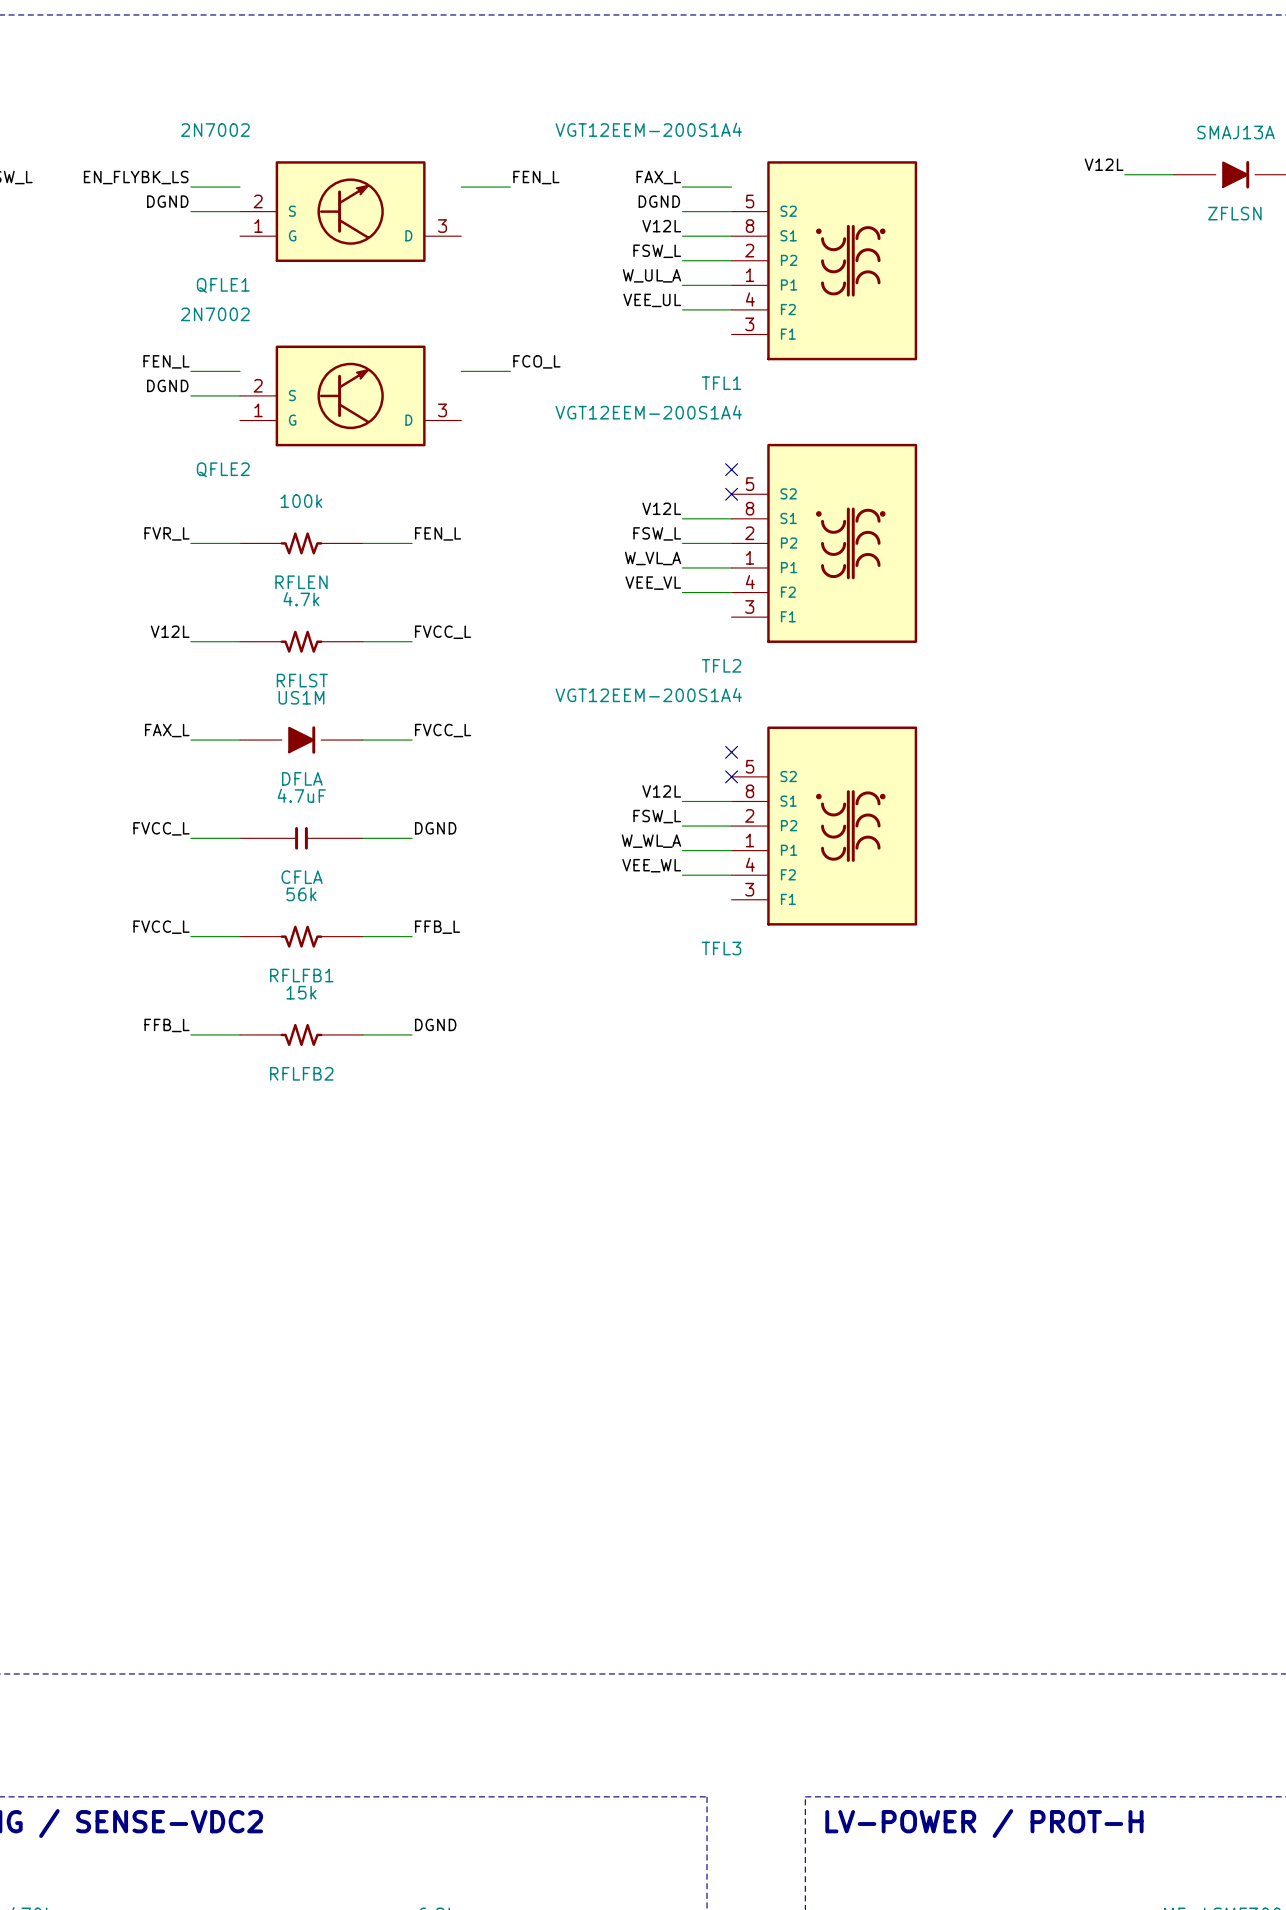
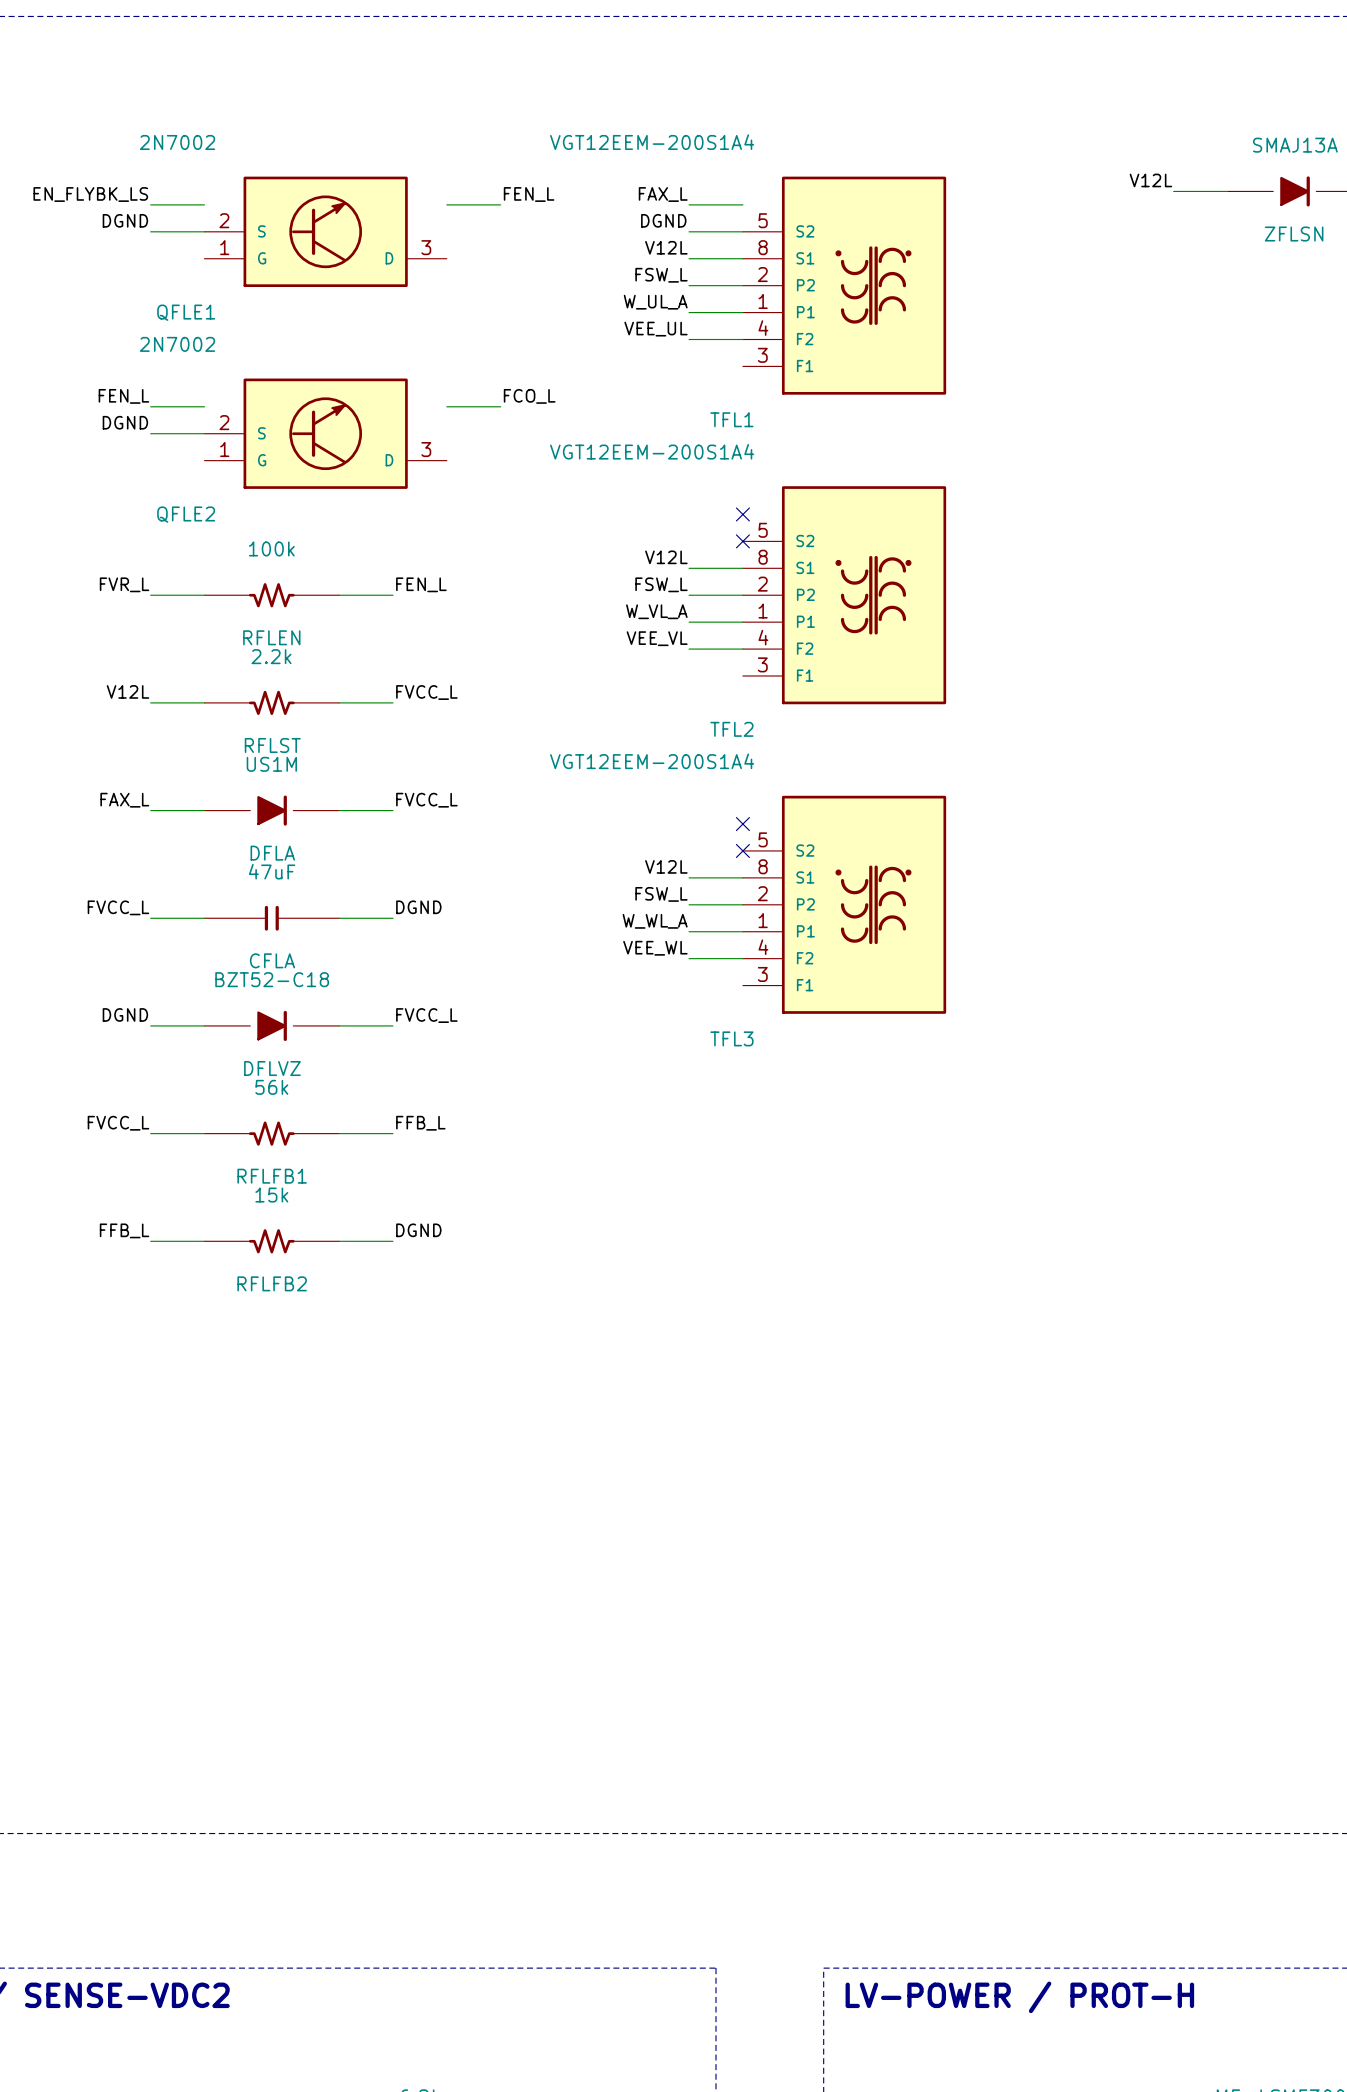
RFLST value: 4.7k (301, 599) -> 2.2k (271, 656)
CFLA value: 4.7uF (301, 795) -> 47uF (272, 871)
label: FVCC_L (161, 927) -> DGND (125, 1014)
label: FFB_L (437, 927) -> FVCC_L (426, 1015)
RFLFB1: 56k (301, 936) -> none
DFLVZ: none -> BZT52-C18 (271, 1025)
RFLFB2 value: 15k (301, 992) -> 56k (271, 1087)
label: DGND (435, 1024) -> FFB_L (420, 1123)
label: FFB_L (167, 1025) -> FVCC_L (118, 1123)
RFLFB2 name: RFLFB2 (301, 1073) -> RFLFB1 (272, 1176)
label: none -> FFB_L (124, 1230)
label: none -> DGND (418, 1230)
wire: none -> (150, 1241) (204, 1241)
RFLFB2: none -> 15k (271, 1241)
wire: none -> (339, 1241) (392, 1241)

